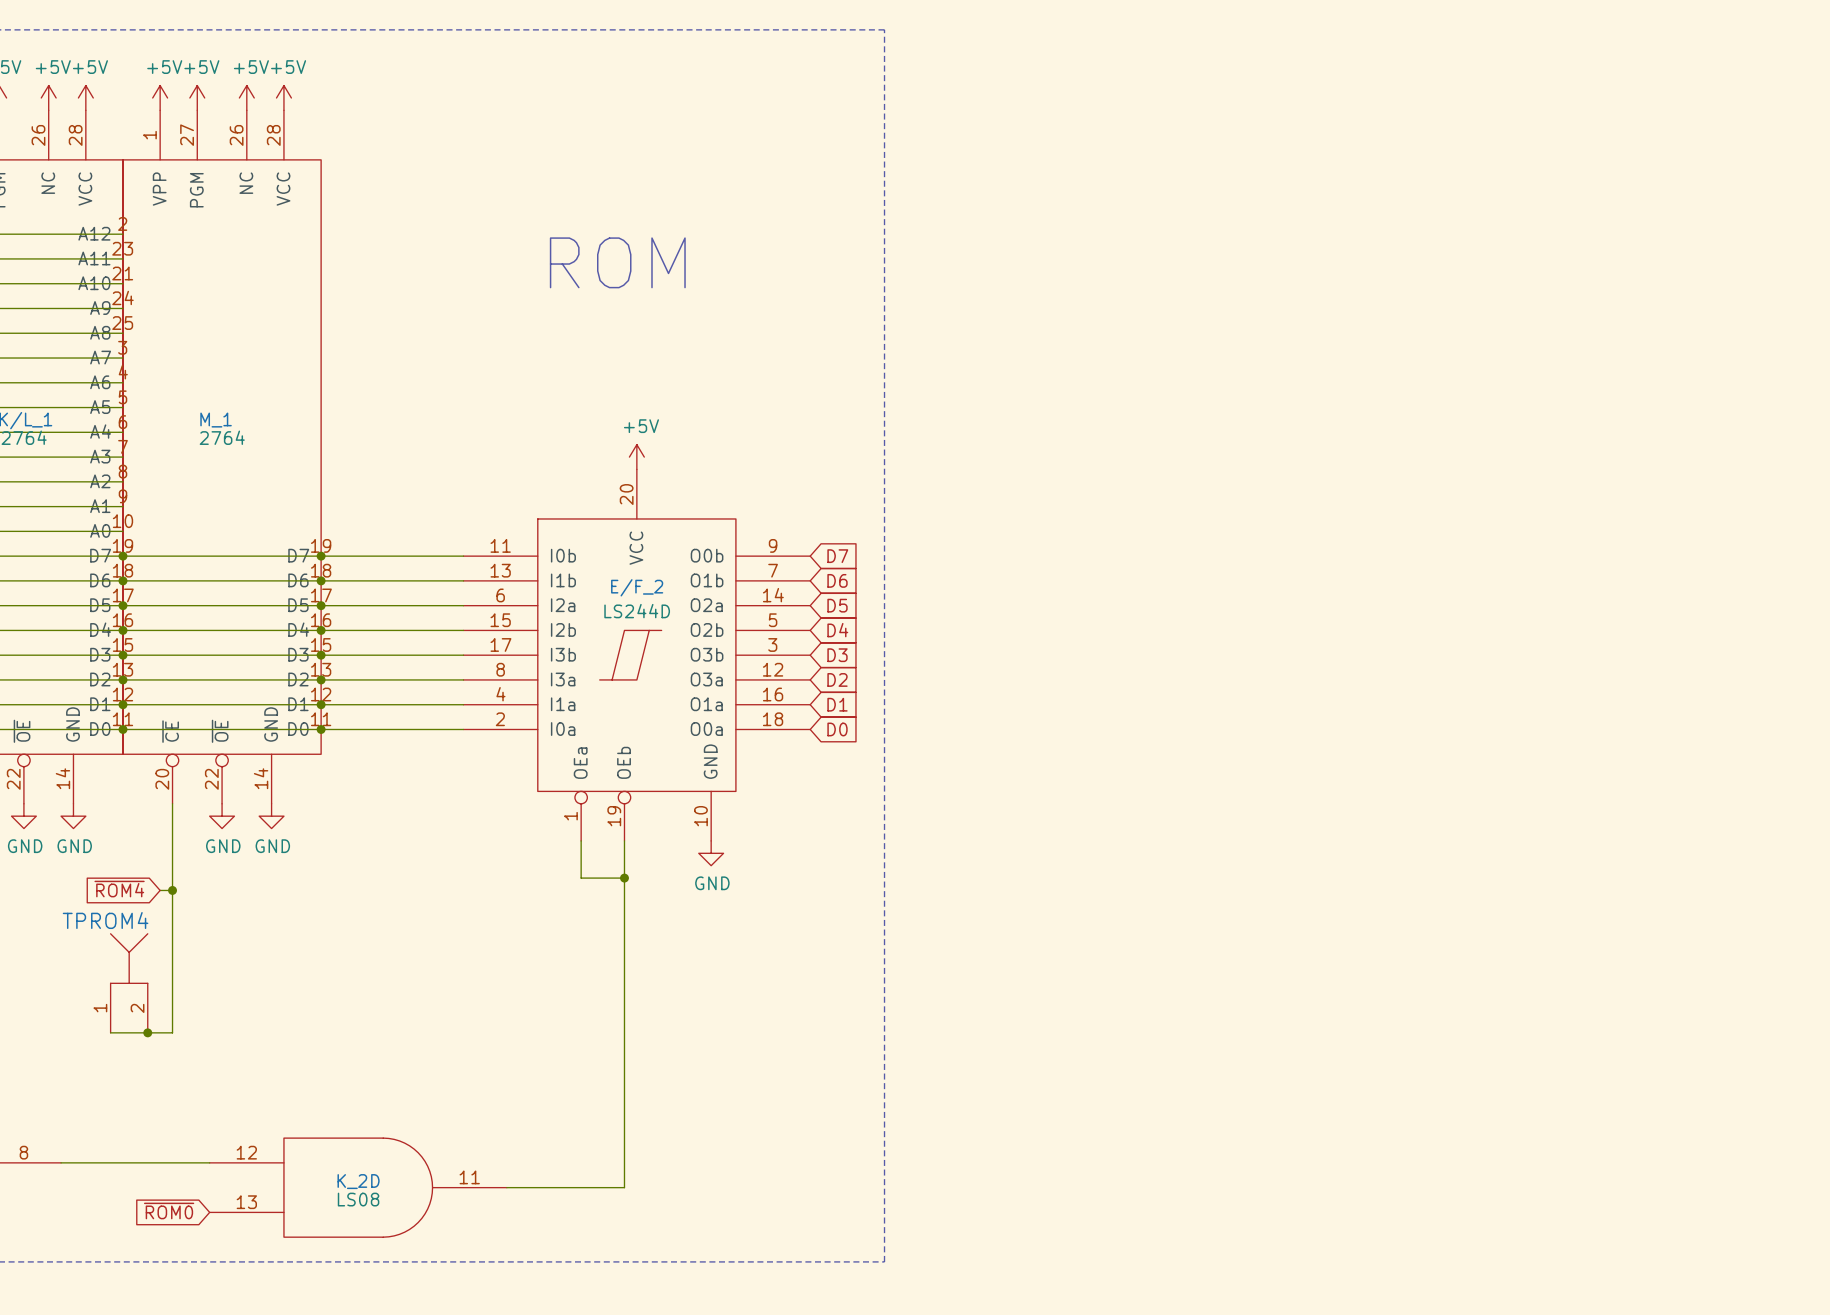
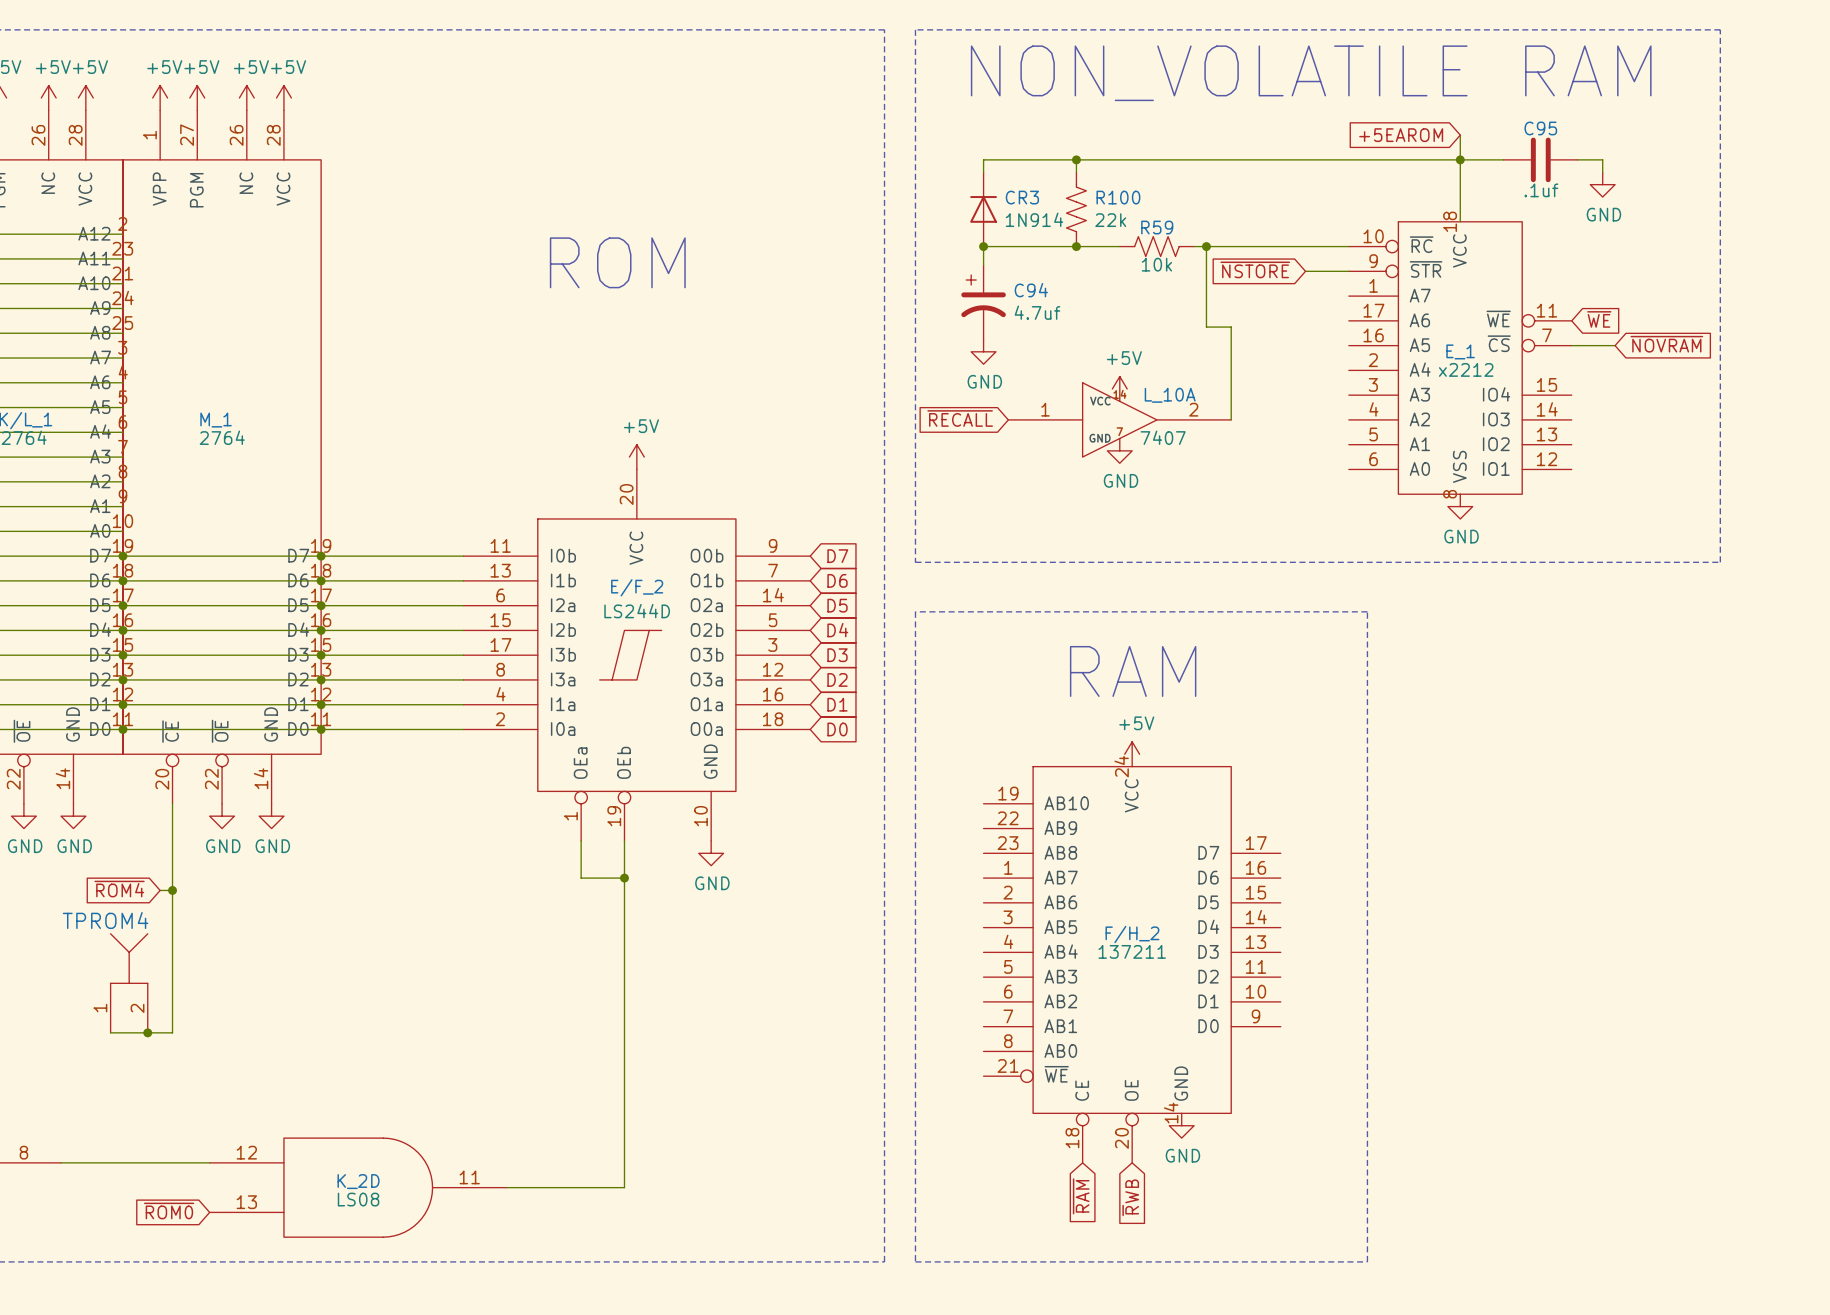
line: none -> (915, 29) (915, 562) (1720, 562) (1720, 29) (915, 29)
text: none -> NON_VOLATILE RAM (1311, 73)
global label: none -> +5EAROM (1401, 135)
wire: none -> (1460, 135) (1460, 221)
wire: none -> (1076, 159) (1076, 172)
junction: none -> (1076, 159)
junction: none -> (1460, 159)
wire: none -> (1503, 159) (983, 159) (983, 172)
C95: none -> .1uf (1540, 159)
wire: none -> (1577, 159) (1602, 159) (1602, 172)
power symbol: none -> GND (1602, 184)
CR3: none -> 1N914 (983, 209)
R100: none -> 22k (1076, 209)
junction: none -> (983, 246)
junction: none -> (1076, 246)
wire: none -> (1119, 246) (983, 246) (983, 265)
R59: none -> 10k (1156, 246)
wire: none -> (1194, 246) (1348, 246)
wire: none -> (1206, 246) (1206, 327) (1231, 327) (1231, 419)
junction: none -> (1206, 246)
global label: none -> ~{NSTORE} (1255, 269)
wire: none -> (1305, 271) (1348, 271)
C94: none -> 4.7uf (983, 302)
global label: none -> ~{WE} (1599, 319)
global label: none -> ~{NOVRAM} (1666, 344)
wire: none -> (1571, 345) (1615, 345)
power symbol: none -> GND (983, 351)
E_1: none -> x2212 (1460, 358)
power symbol: none -> +5V (1119, 388)
global label: none -> ~{RECALL} (960, 418)
L_10A: none -> 7407 (1119, 419)
power symbol: none -> GND (1119, 450)
power symbol: none -> GND (1460, 506)
line: none -> (915, 611) (1367, 611) (1367, 1261) (915, 1261) (915, 611)
text: none -> RAM (1133, 671)
power symbol: none -> +5V (1132, 754)
F/H_2: none -> 137211 (1132, 964)
power symbol: none -> GND (1181, 1125)
global label: none -> ~{RAM} (1081, 1196)
global label: none -> ~{R}WB (1130, 1197)

